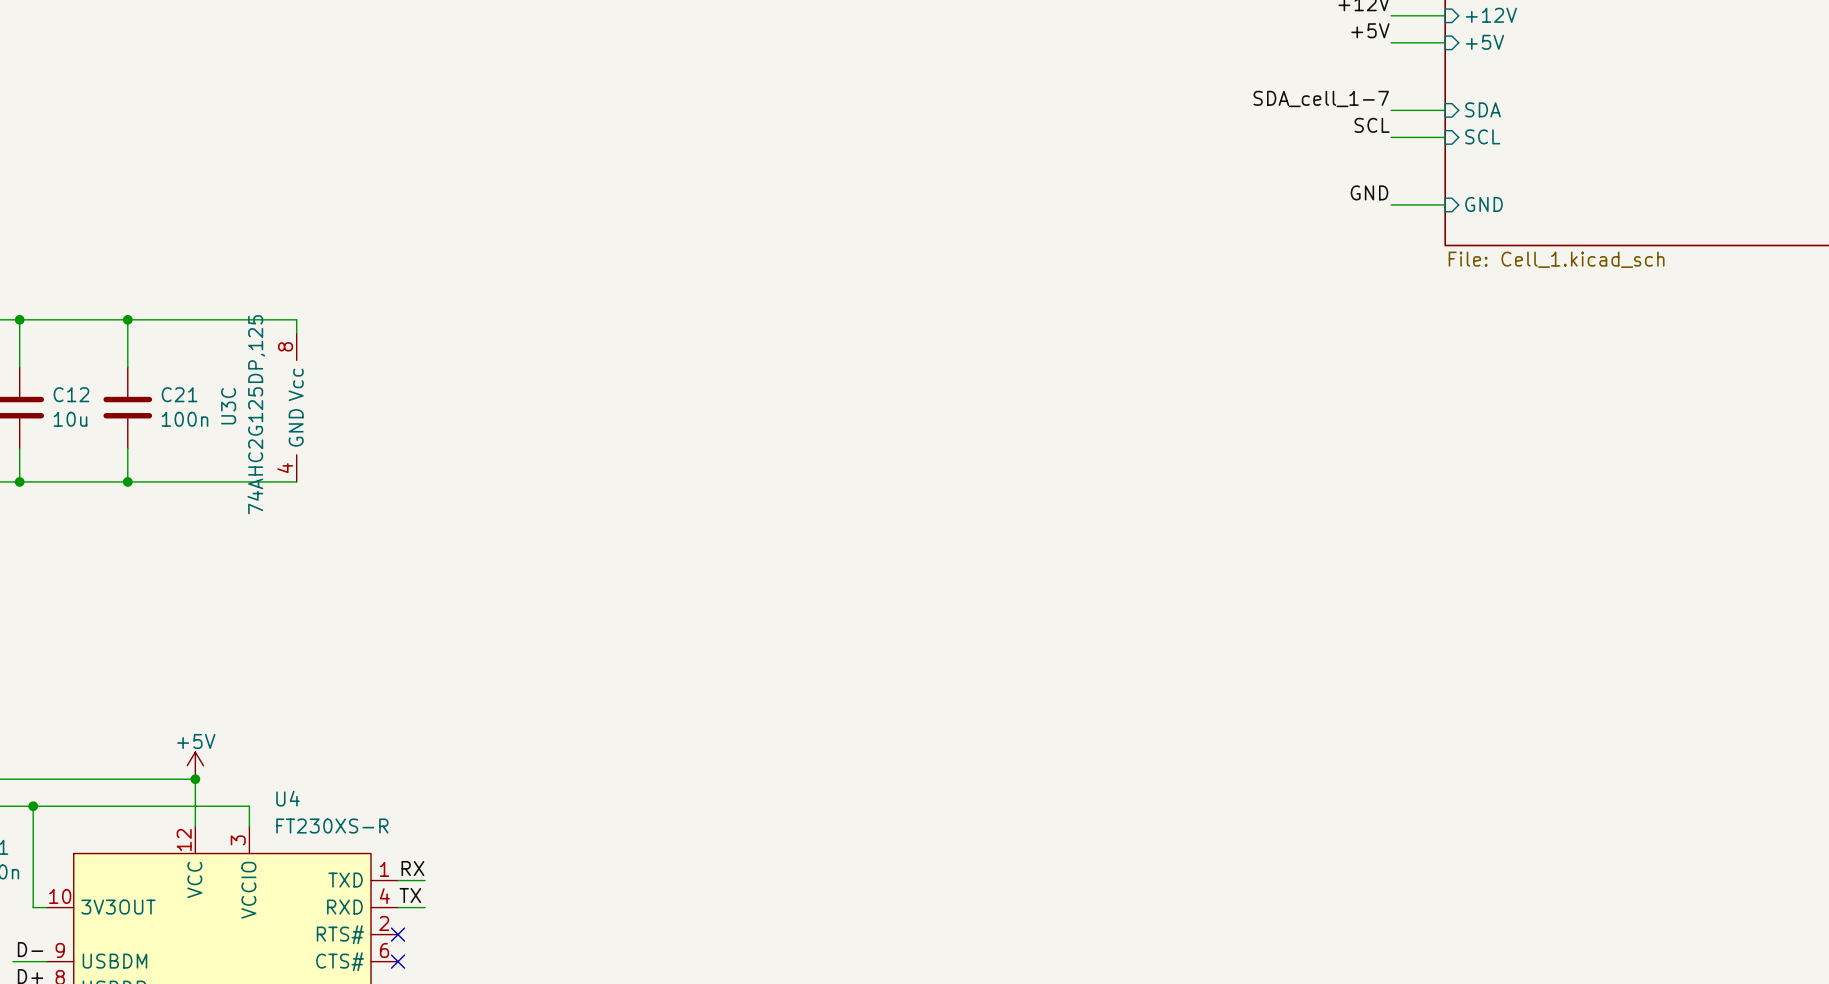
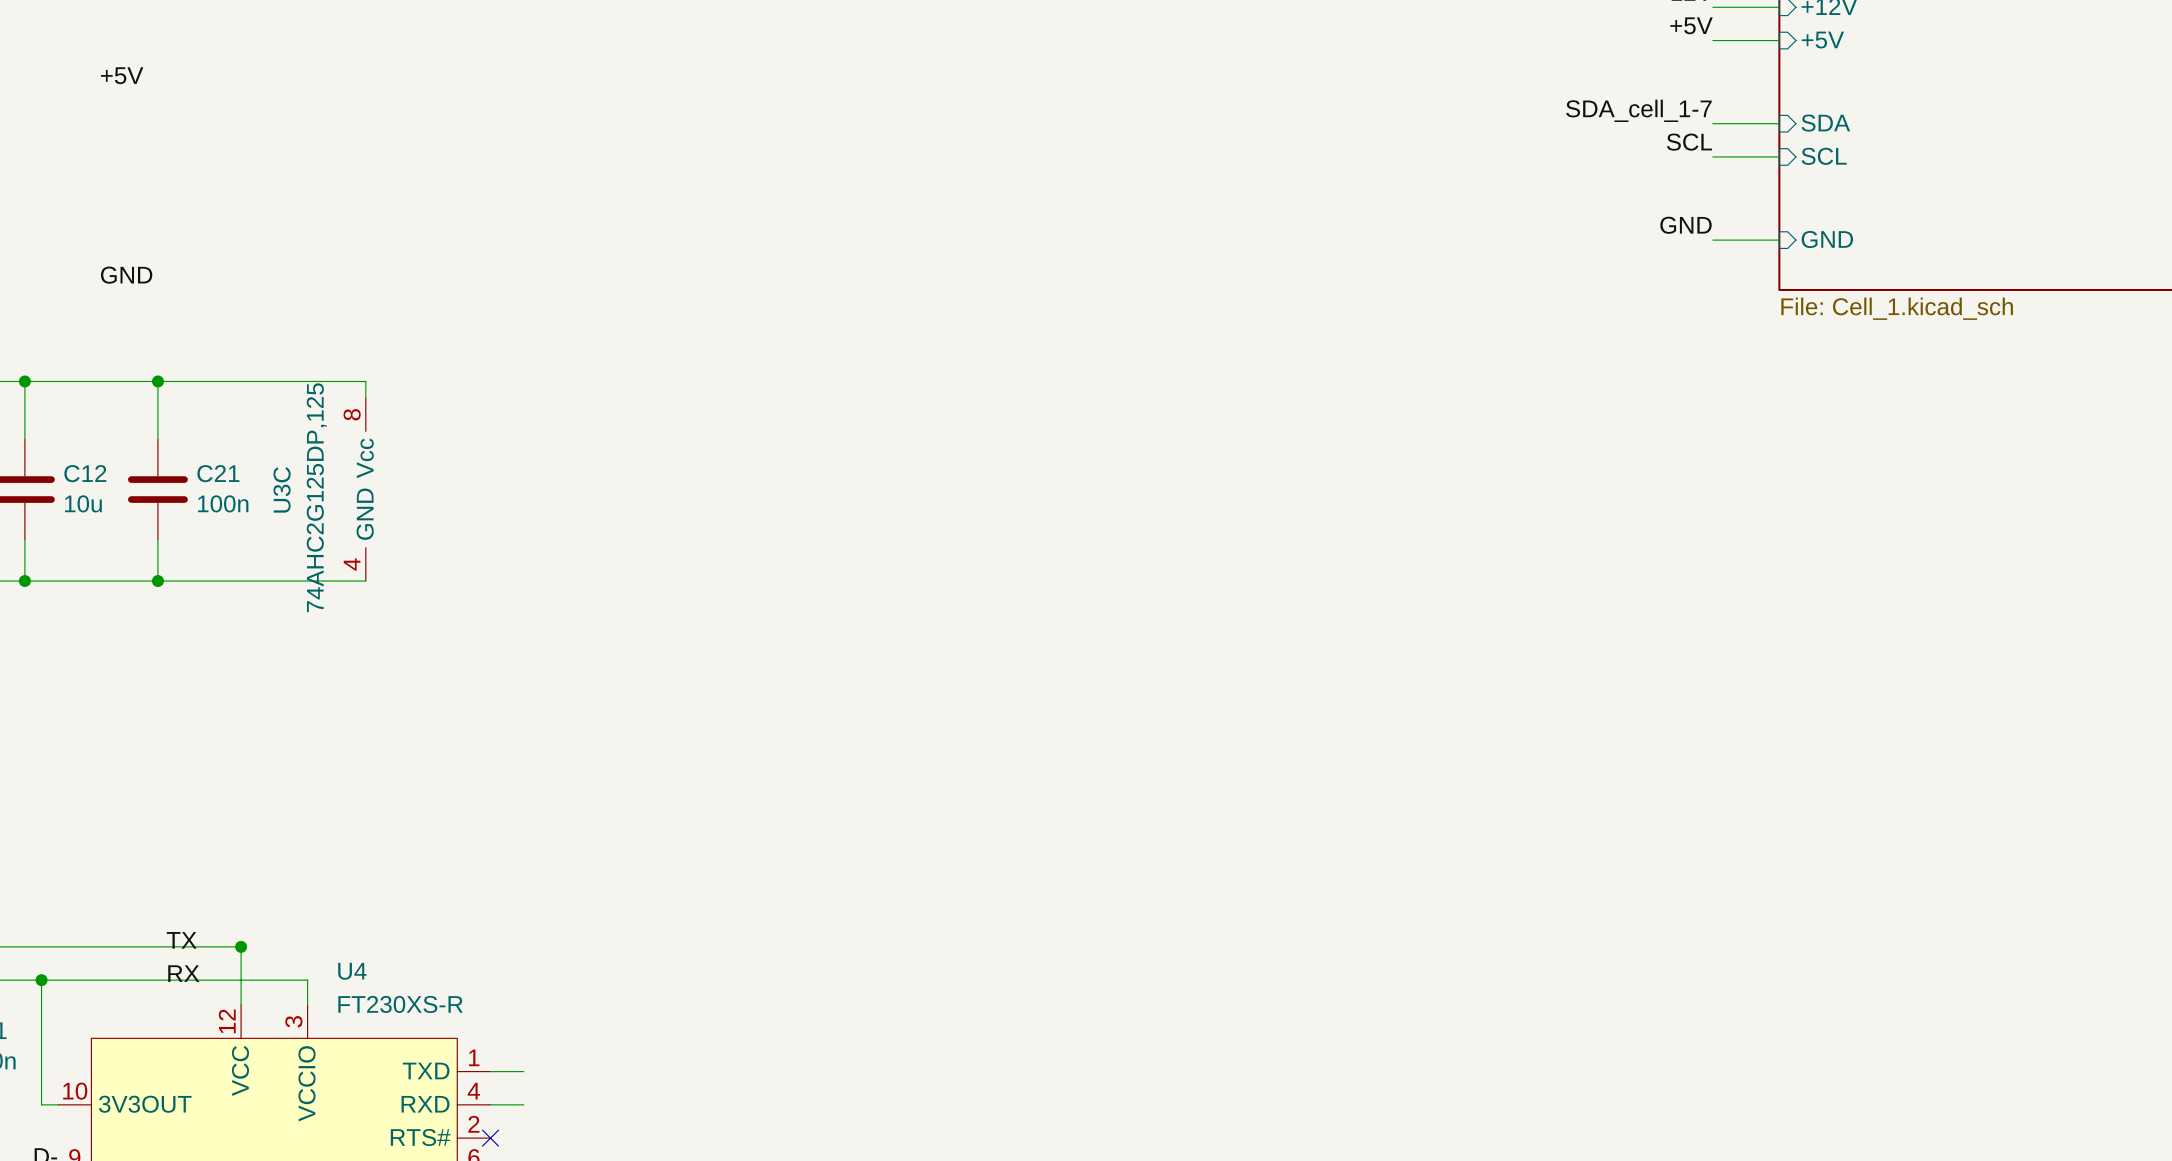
label: none -> +5V (122, 75)
label: none -> GND (126, 275)
power symbol: +5V (195, 765) -> none
label: none -> TX (181, 940)
label: none -> RX (183, 973)
label: RX (412, 868) -> none
label: TX (410, 895) -> none

